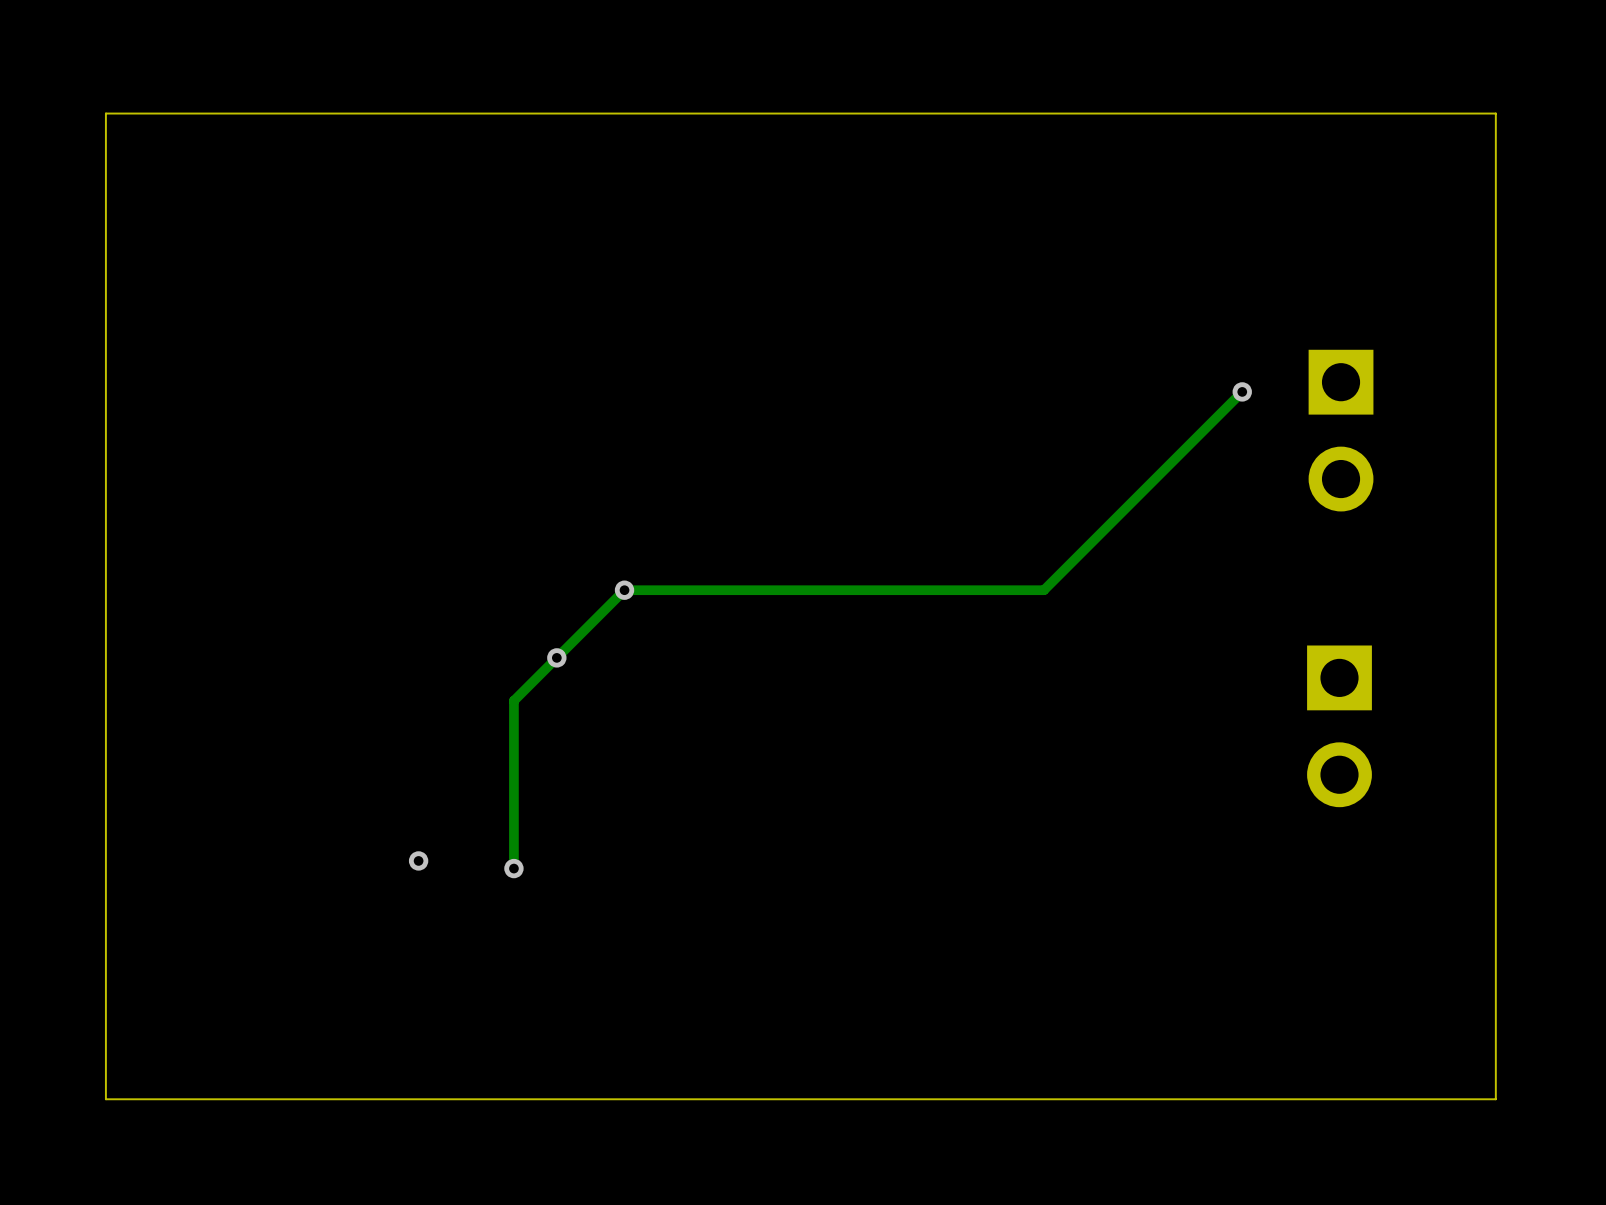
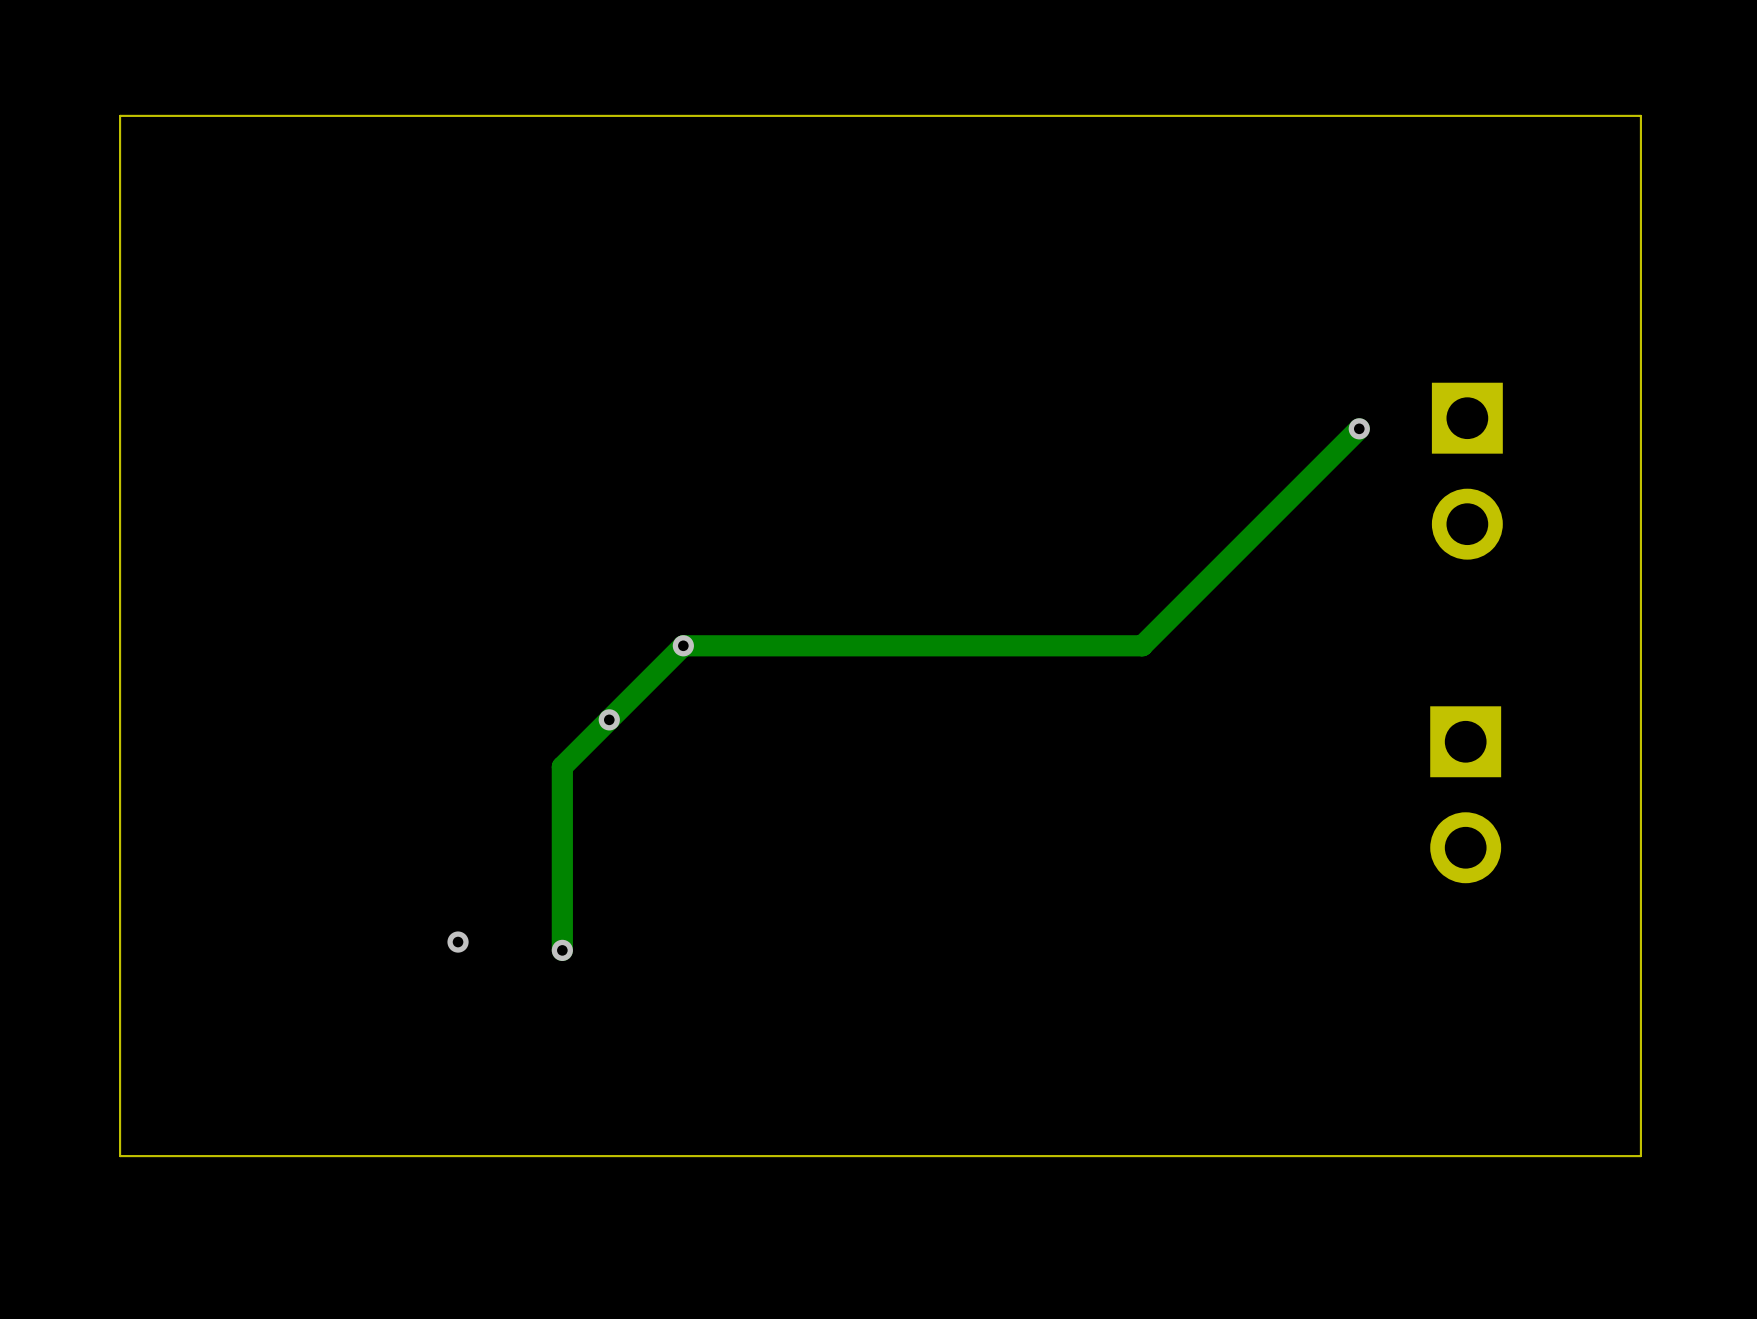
board edge: (1495, 113) (105, 113) (105, 1099) (1495, 1099) (1495, 113) -> (1640, 115) (1640, 1156) (120, 1156) (120, 115) (1640, 115)
track width: thin (1242, 391) (1043, 590) (624, 590) (513, 700) (513, 868) -> thick (1359, 428) (1142, 645) (683, 645) (562, 766) (562, 950)

